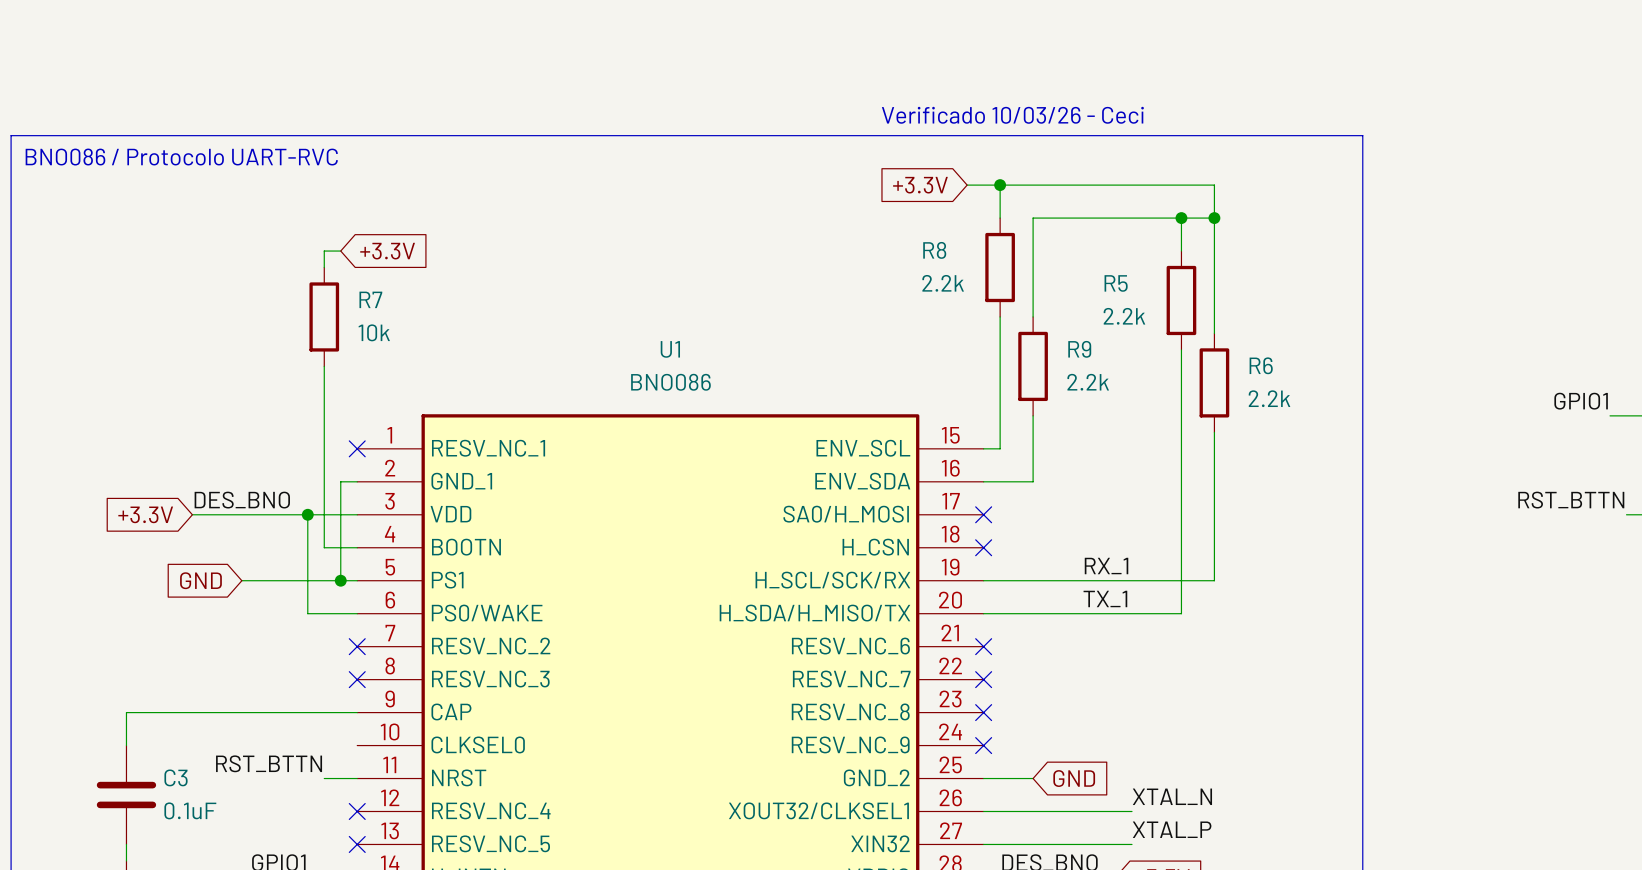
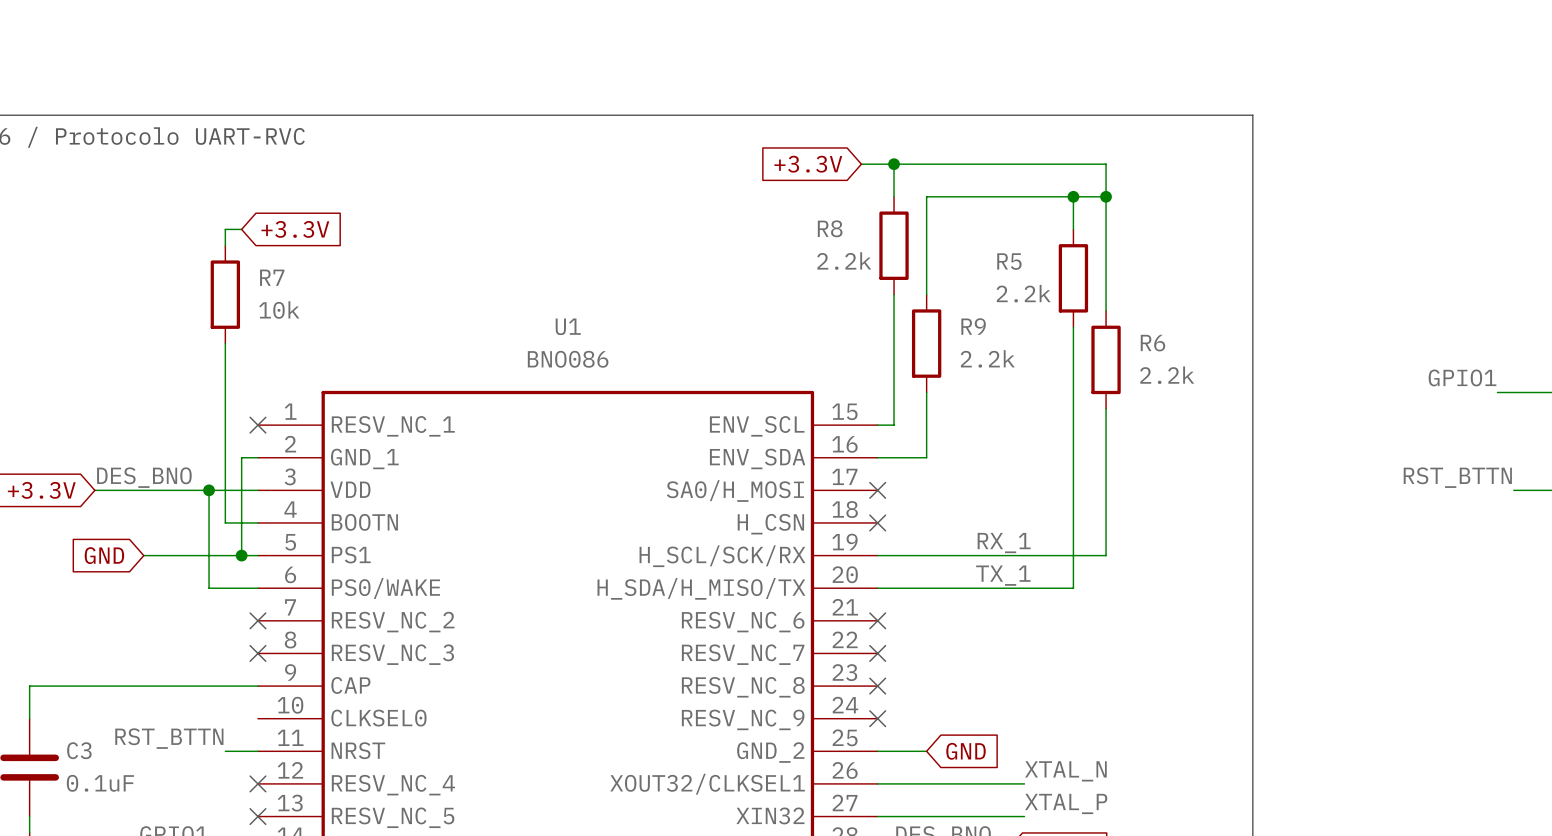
text: Verificado 10/03/26 - Ceci (1012, 115) -> none

